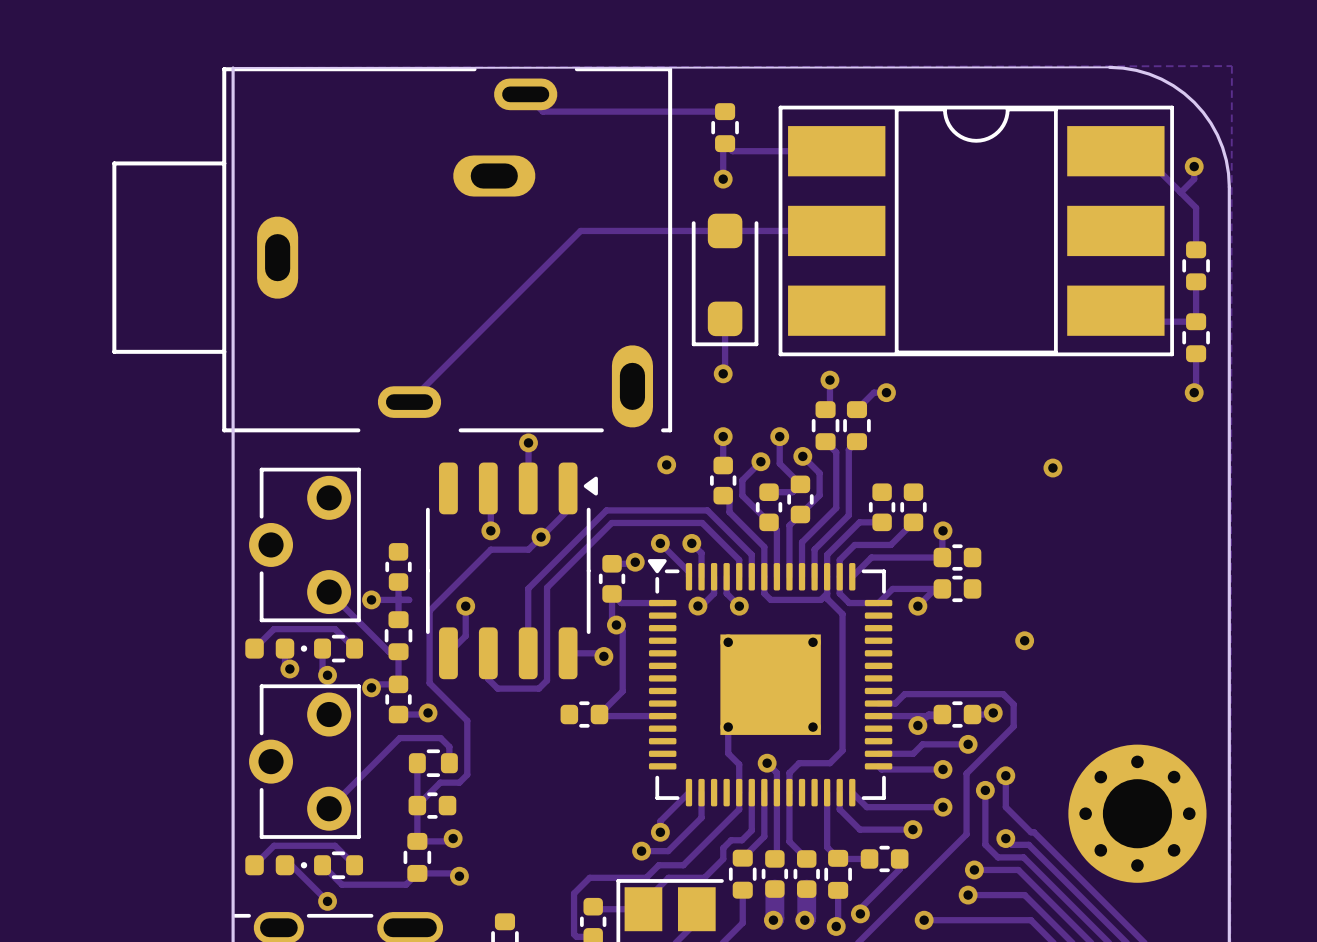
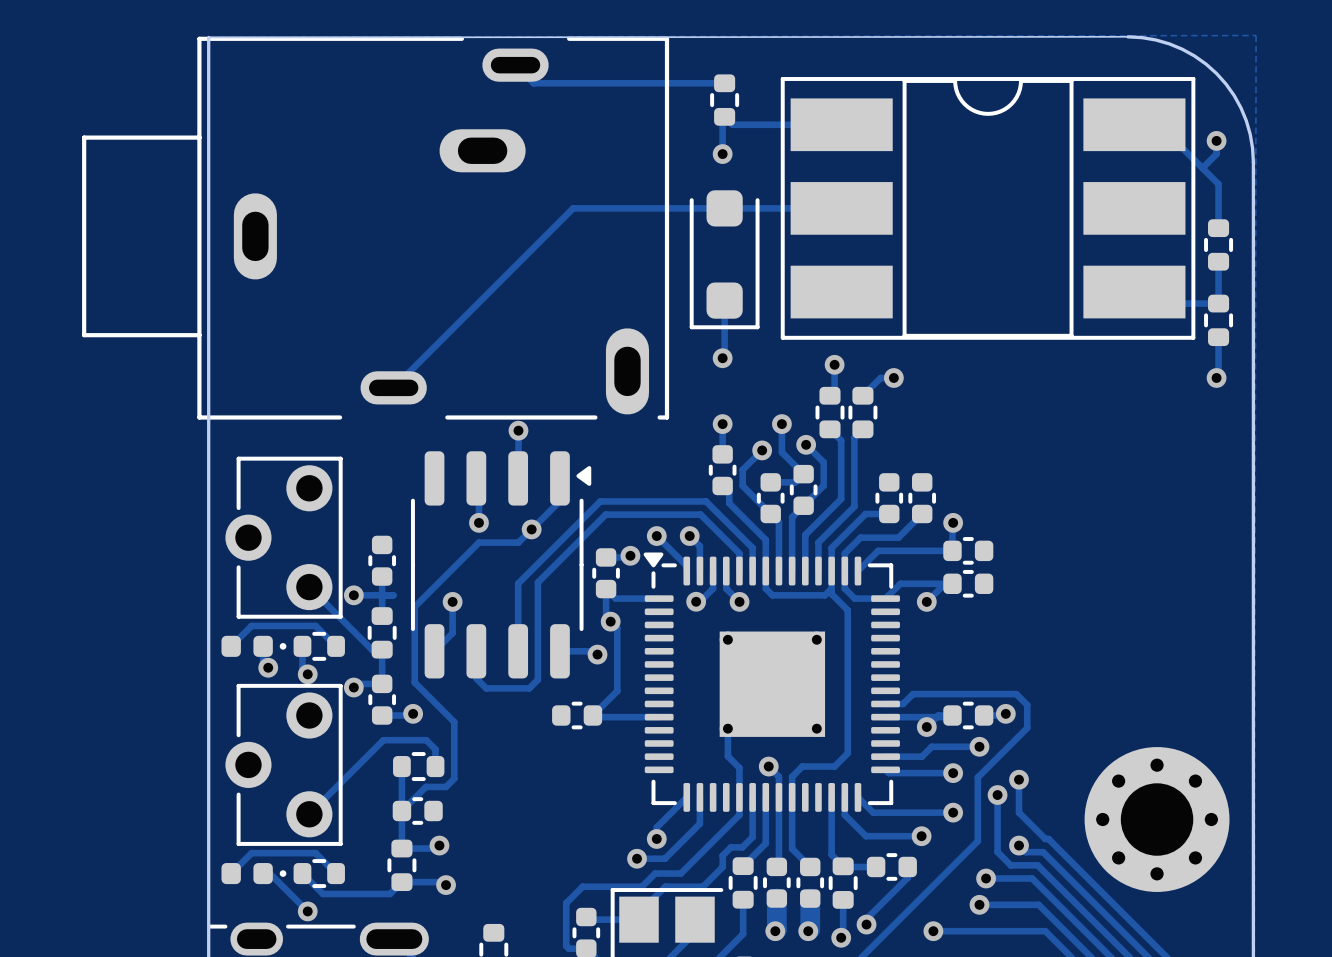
via: (666, 464) -> none
via: (1052, 468) -> none
via: (1024, 640) -> none

